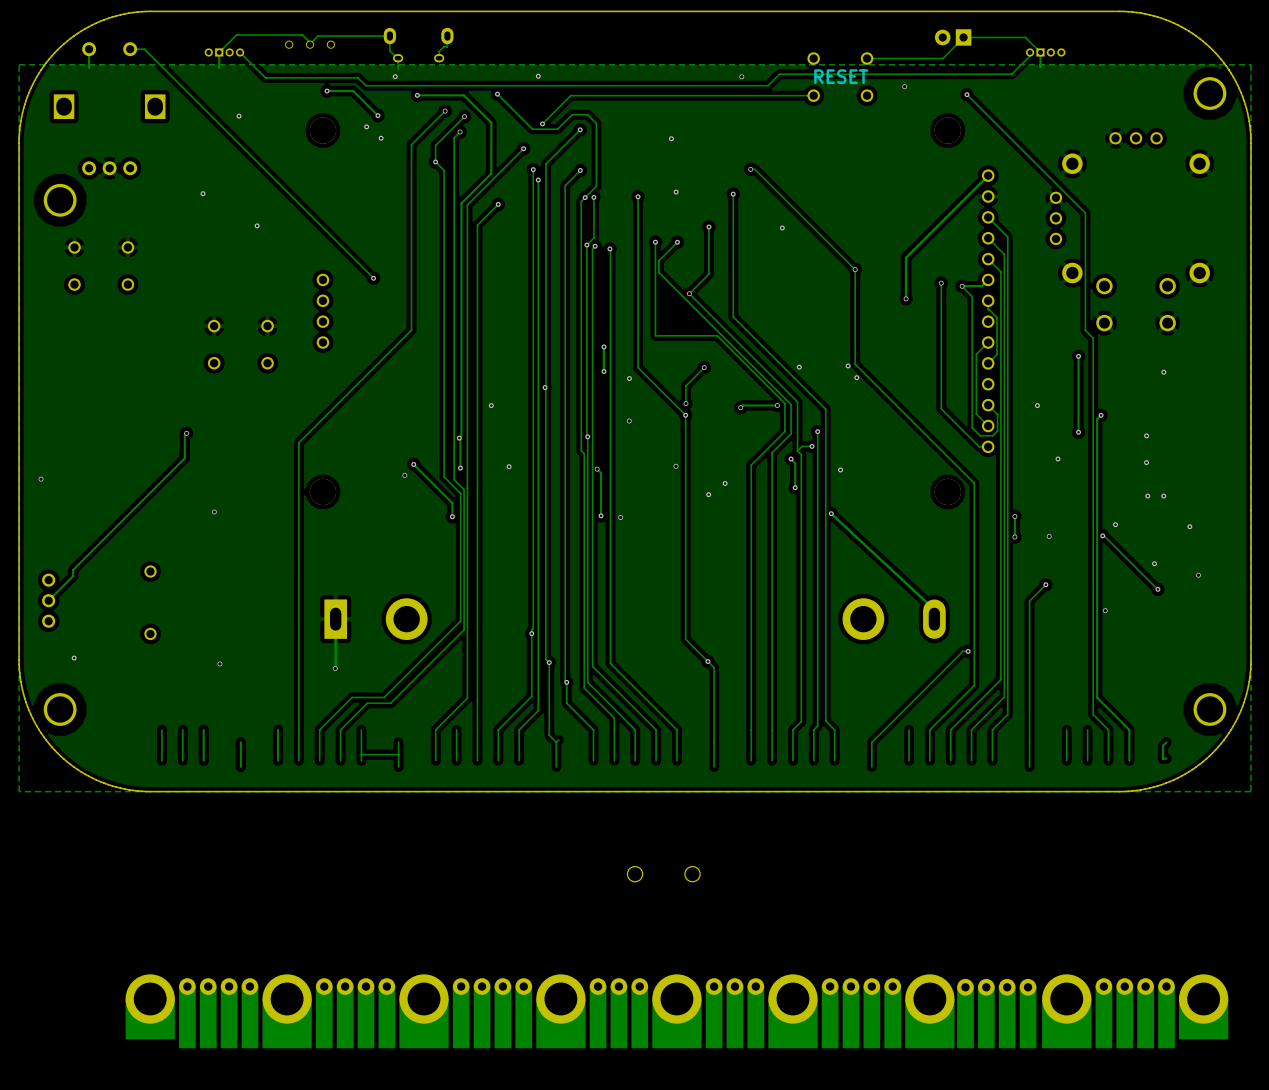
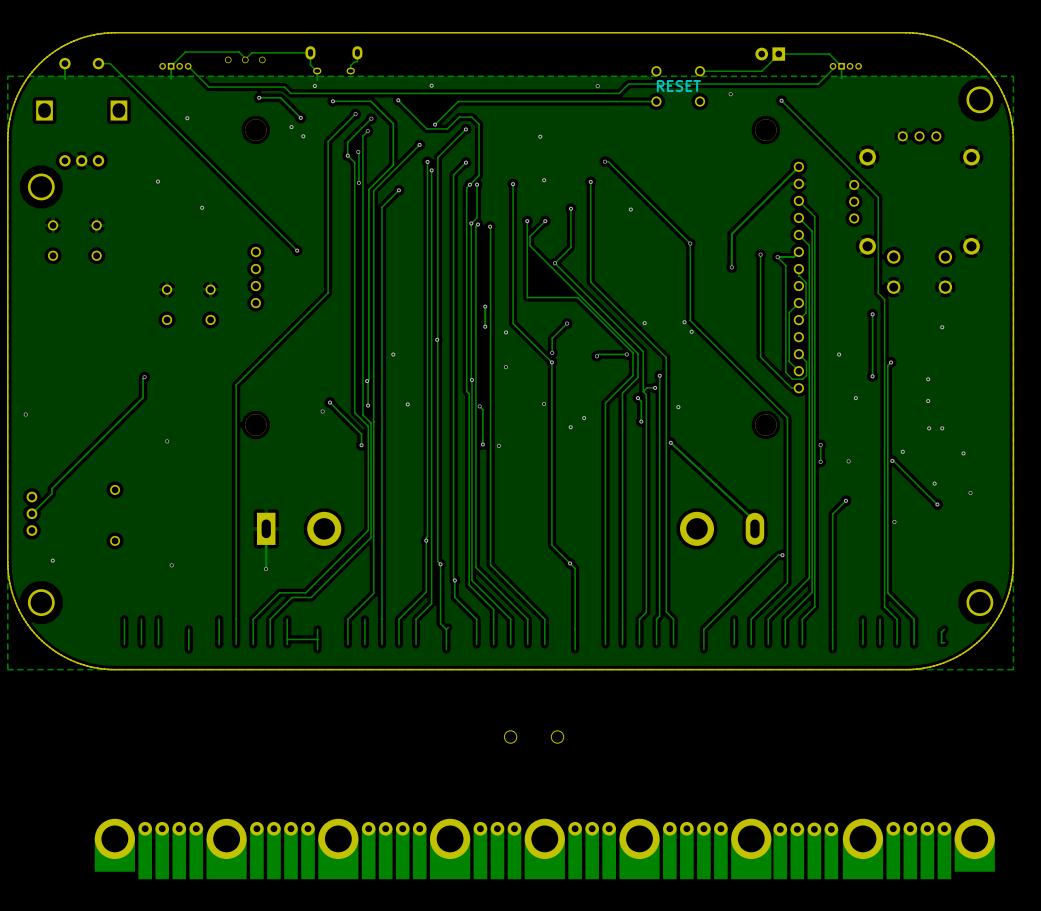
track: none -> (358, 151) (358, 182)
via: none -> (358, 151)
via: none -> (358, 182)

